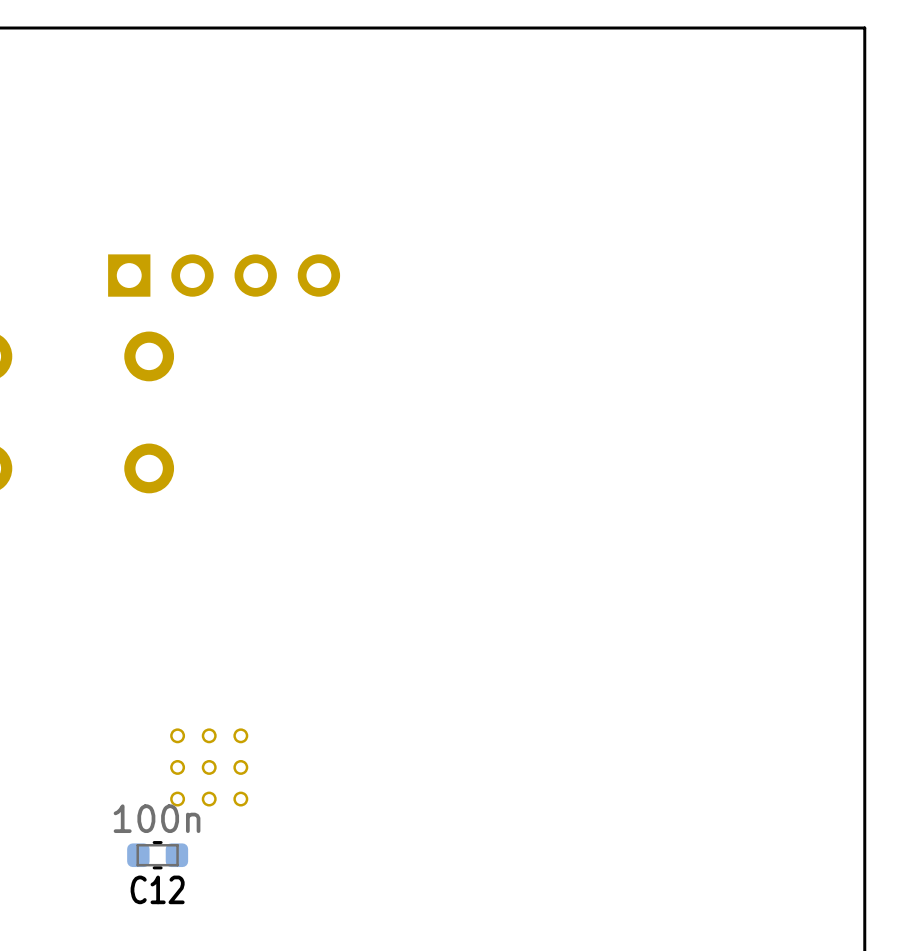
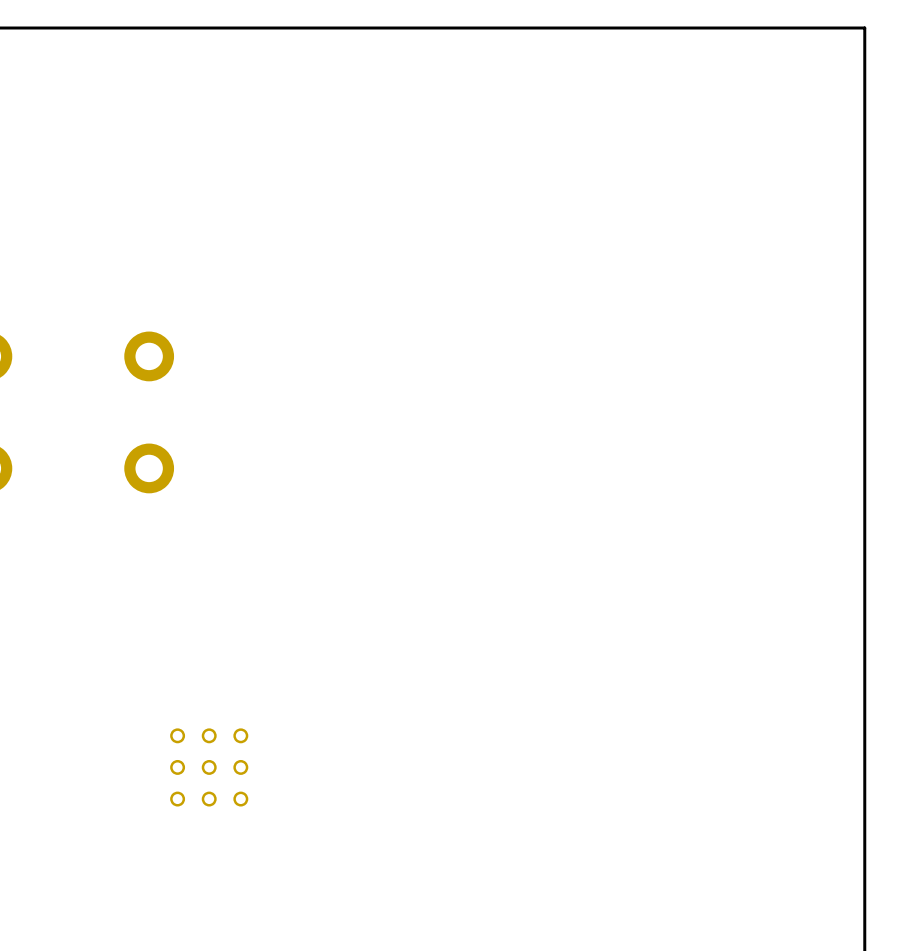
part: (224, 275) -> none
C12: 100n (157, 855) -> none

